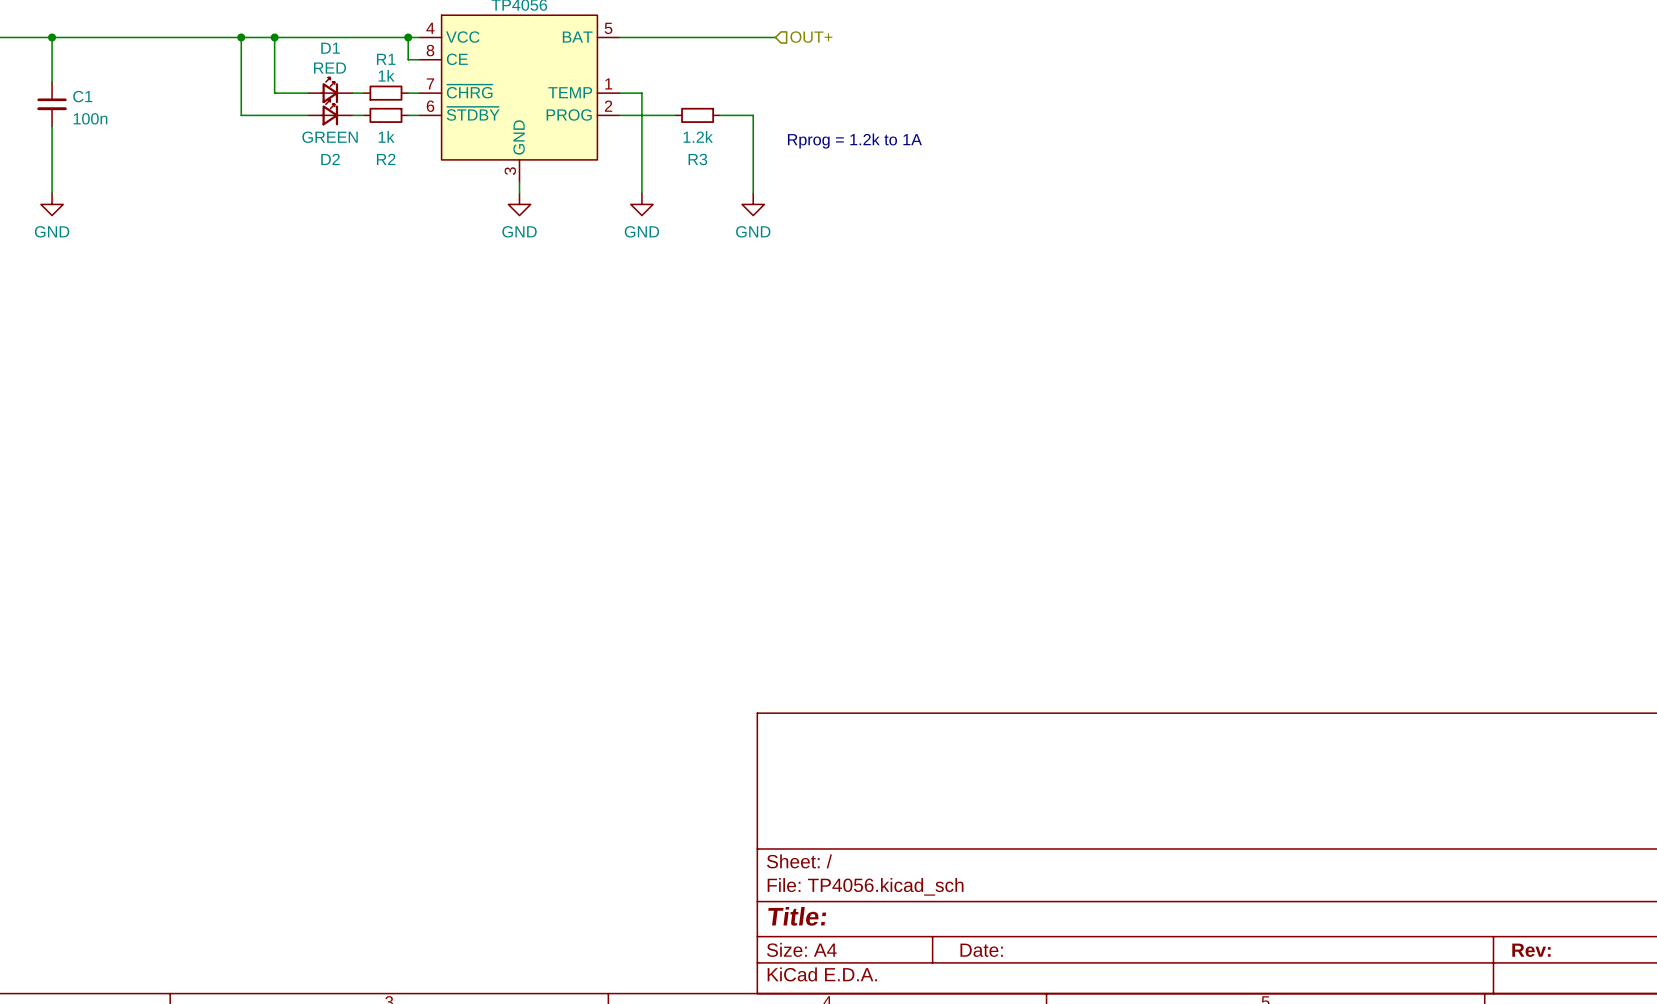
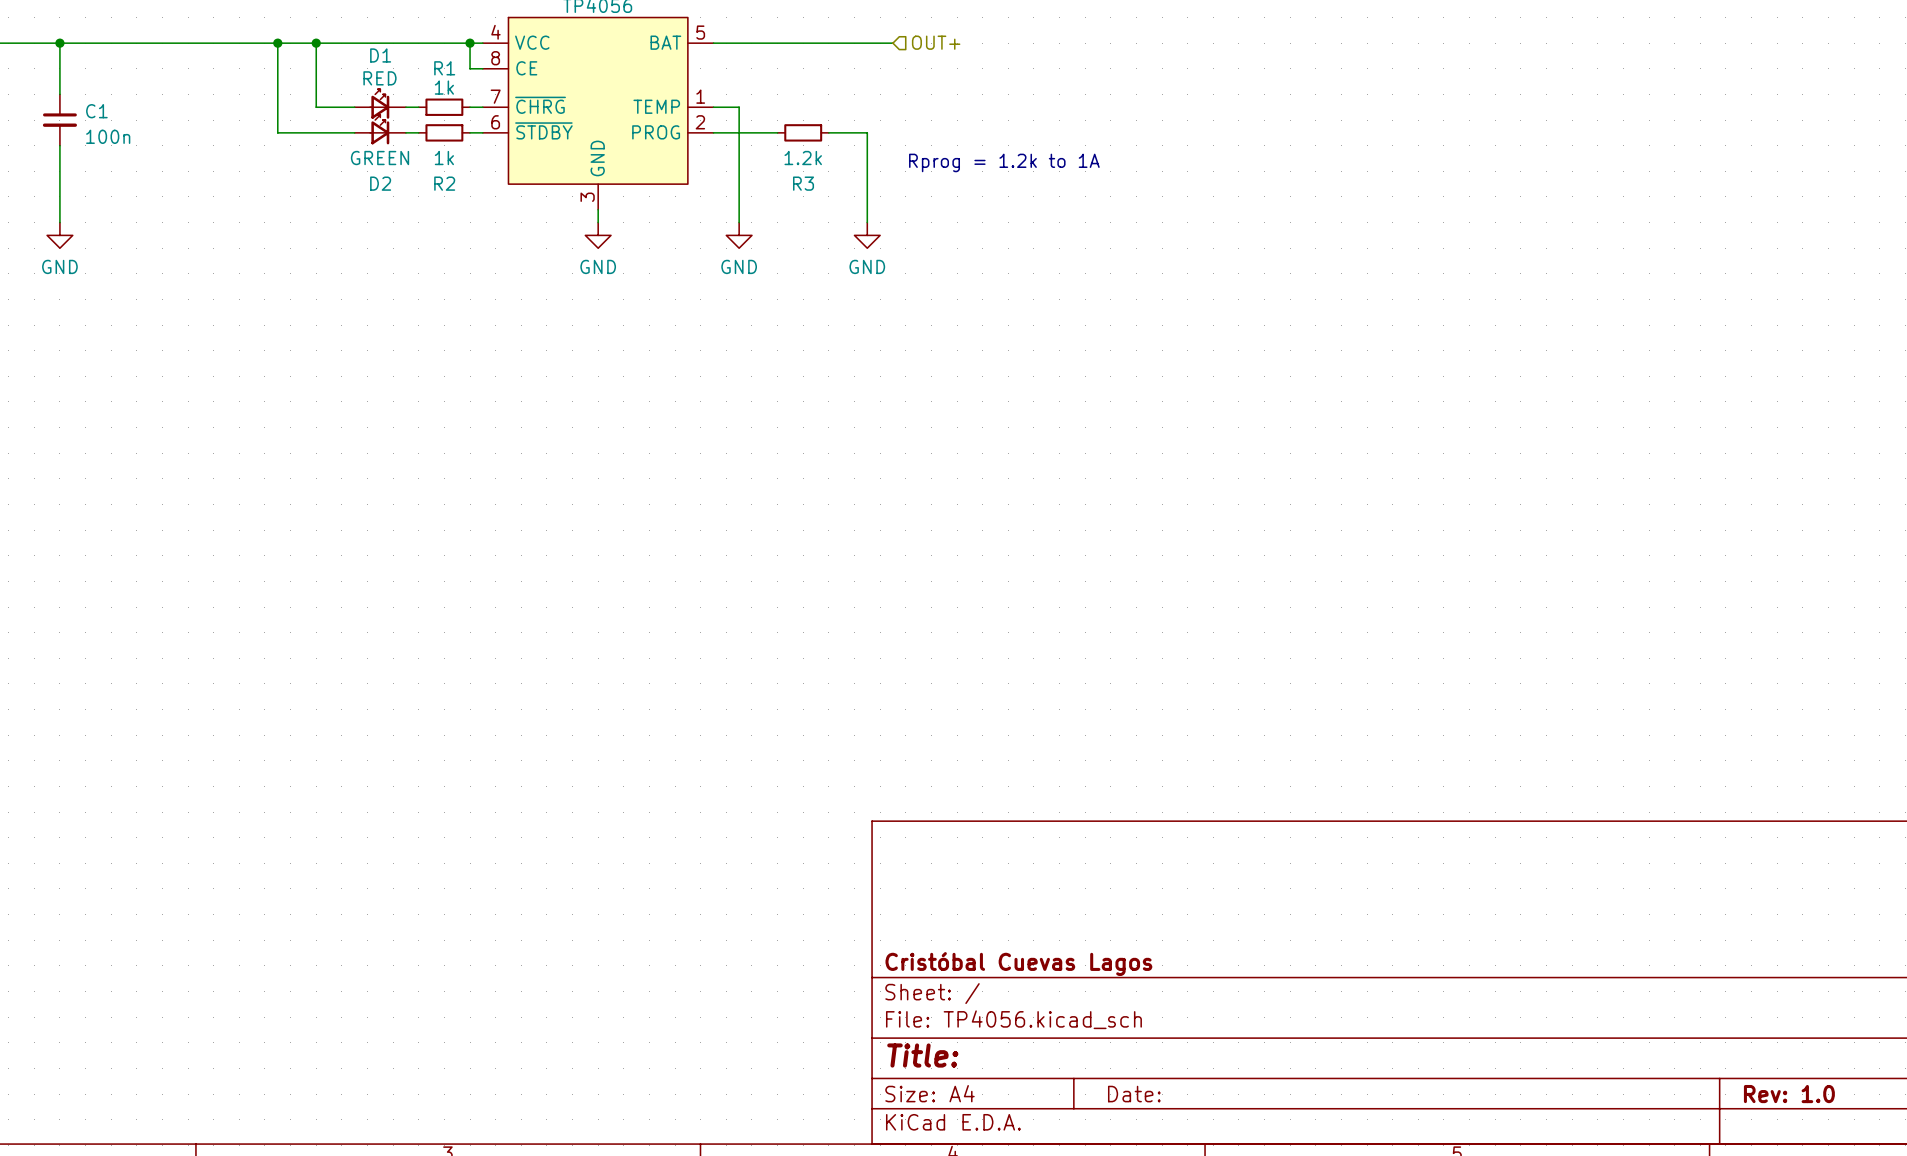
title block: none -> Cristóbal Cuevas Lagos (1018, 964)
title block: Rev: (1531, 950) -> Rev: 1.0 (1789, 1094)

